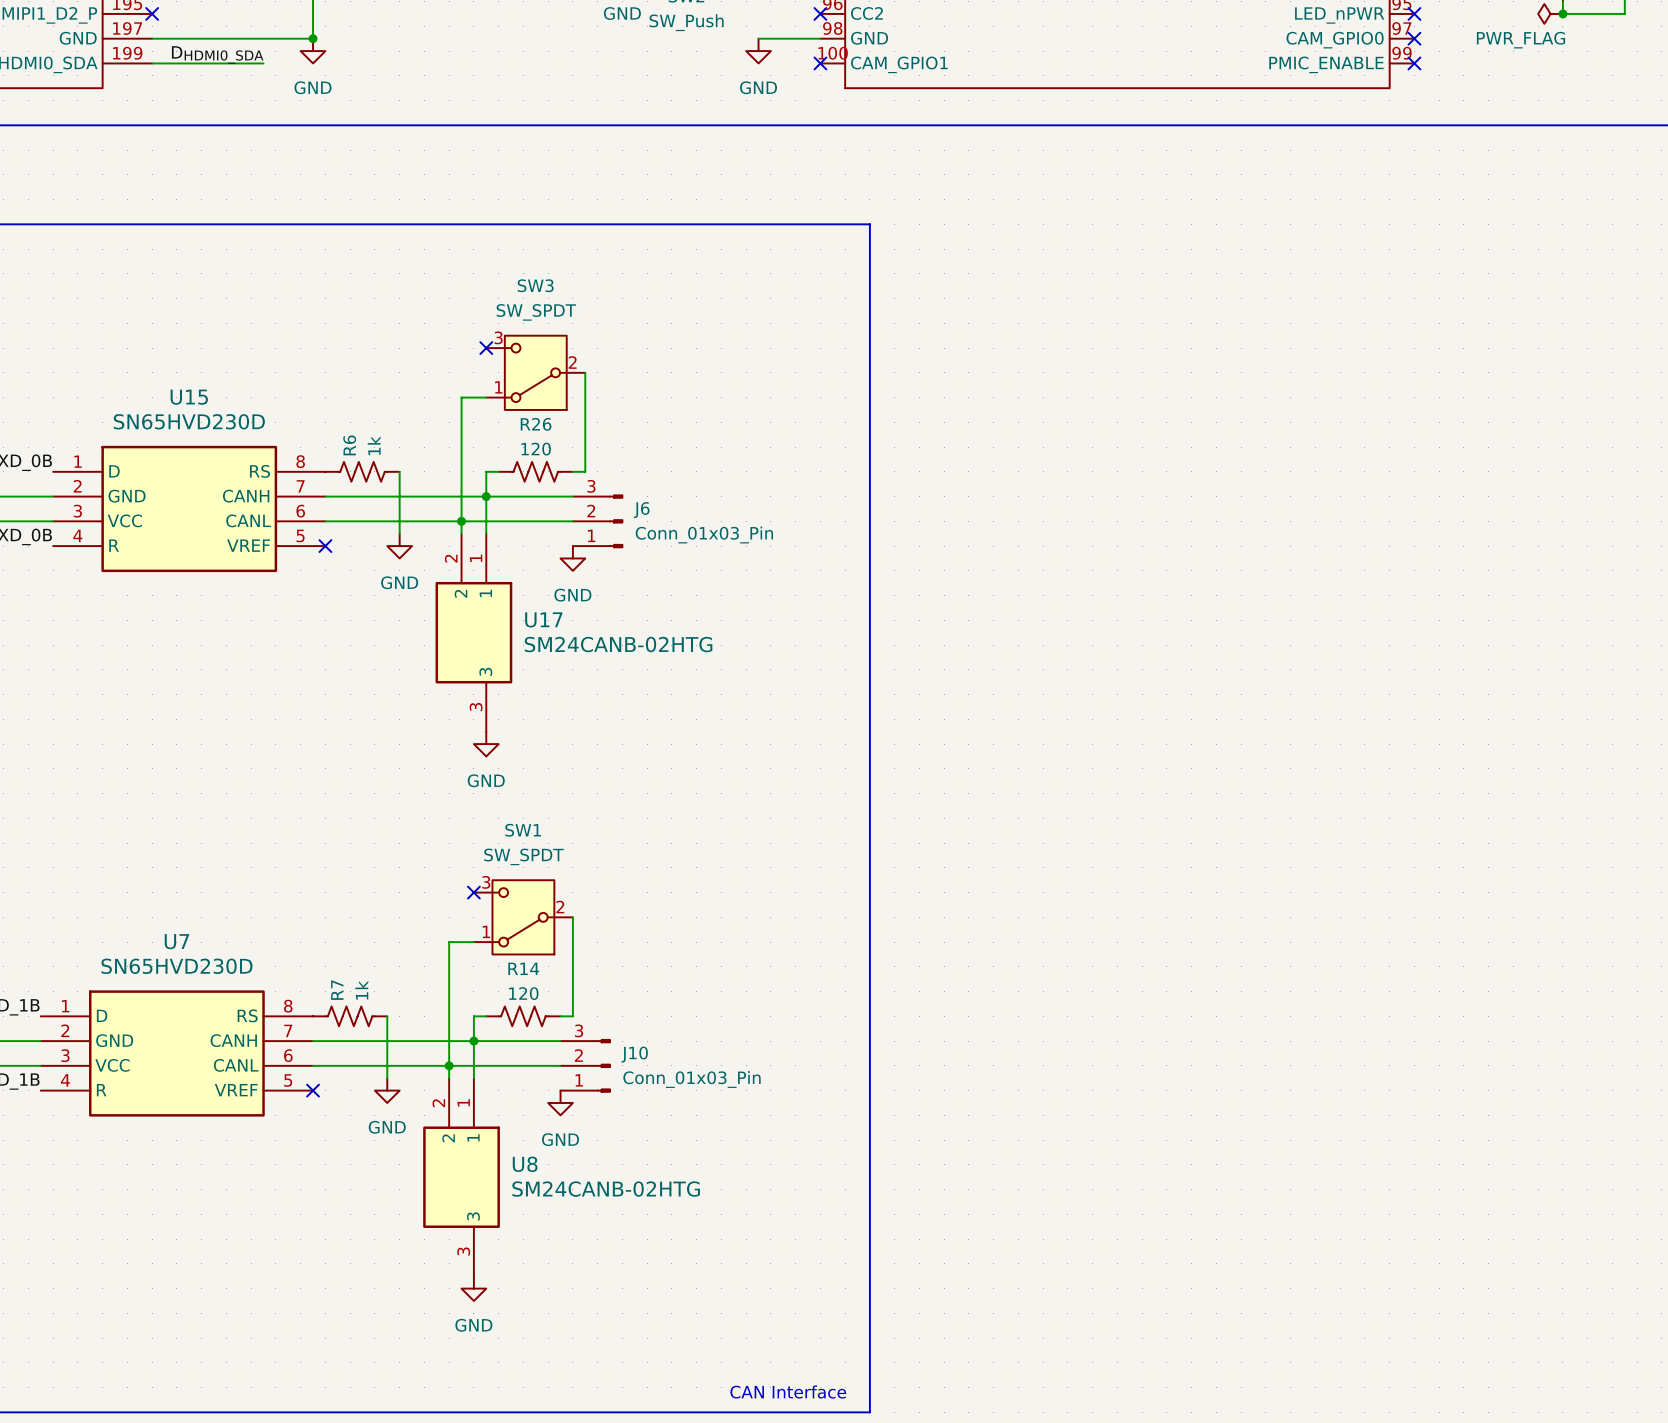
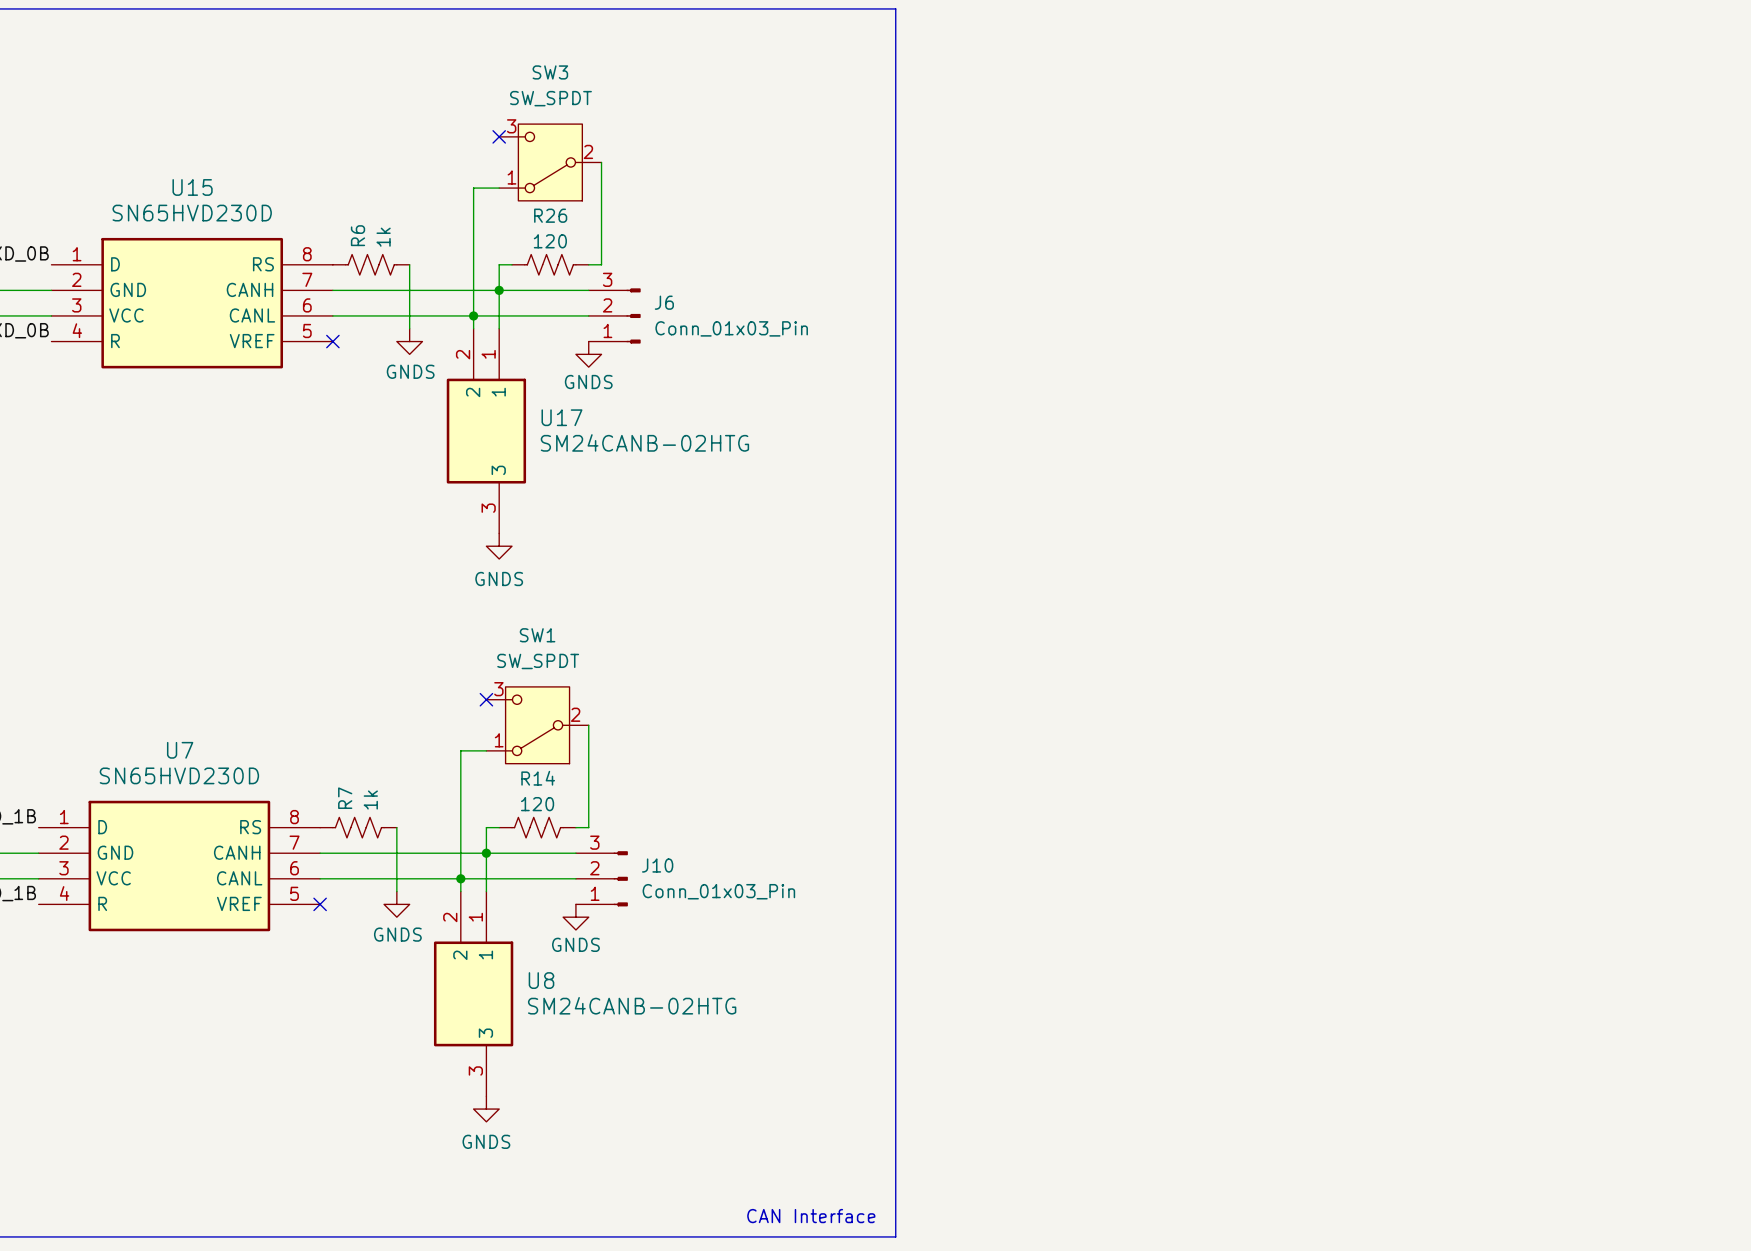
power symbol: GND (399, 546) -> GNDS (409, 341)
power symbol: GND (572, 558) -> GNDS (588, 354)
power symbol: GND (486, 744) -> GNDS (499, 546)
power symbol: GND (387, 1090) -> GNDS (396, 904)
power symbol: GND (560, 1102) -> GNDS (575, 917)
power symbol: GND (473, 1288) -> GNDS (486, 1109)

